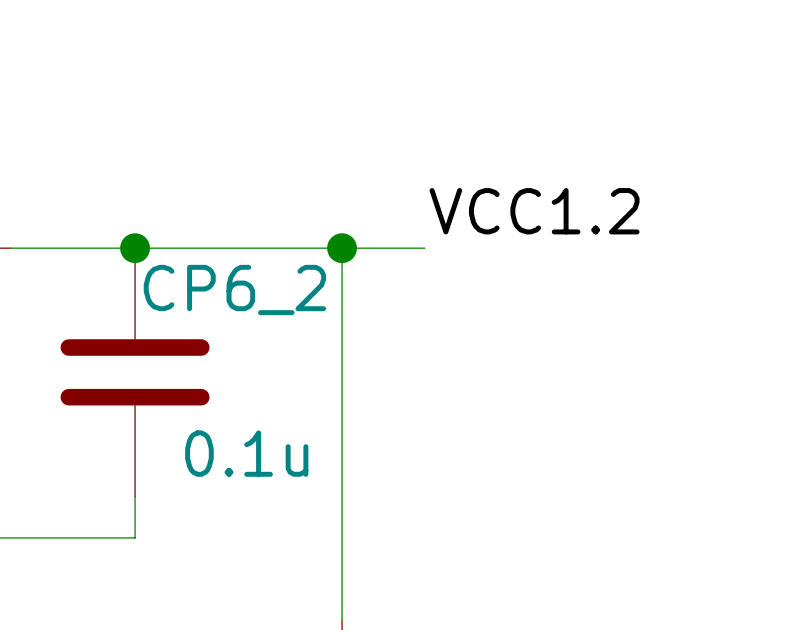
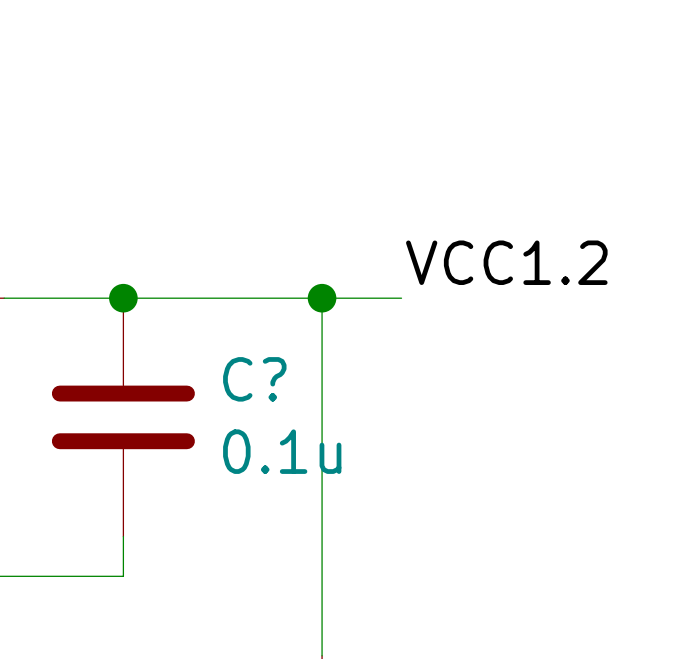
CP6_2 name: CP6_2 (234, 289) -> C? (254, 379)
CP6_2 value position: 0.1u (246, 453) -> 0.1u (282, 451)

